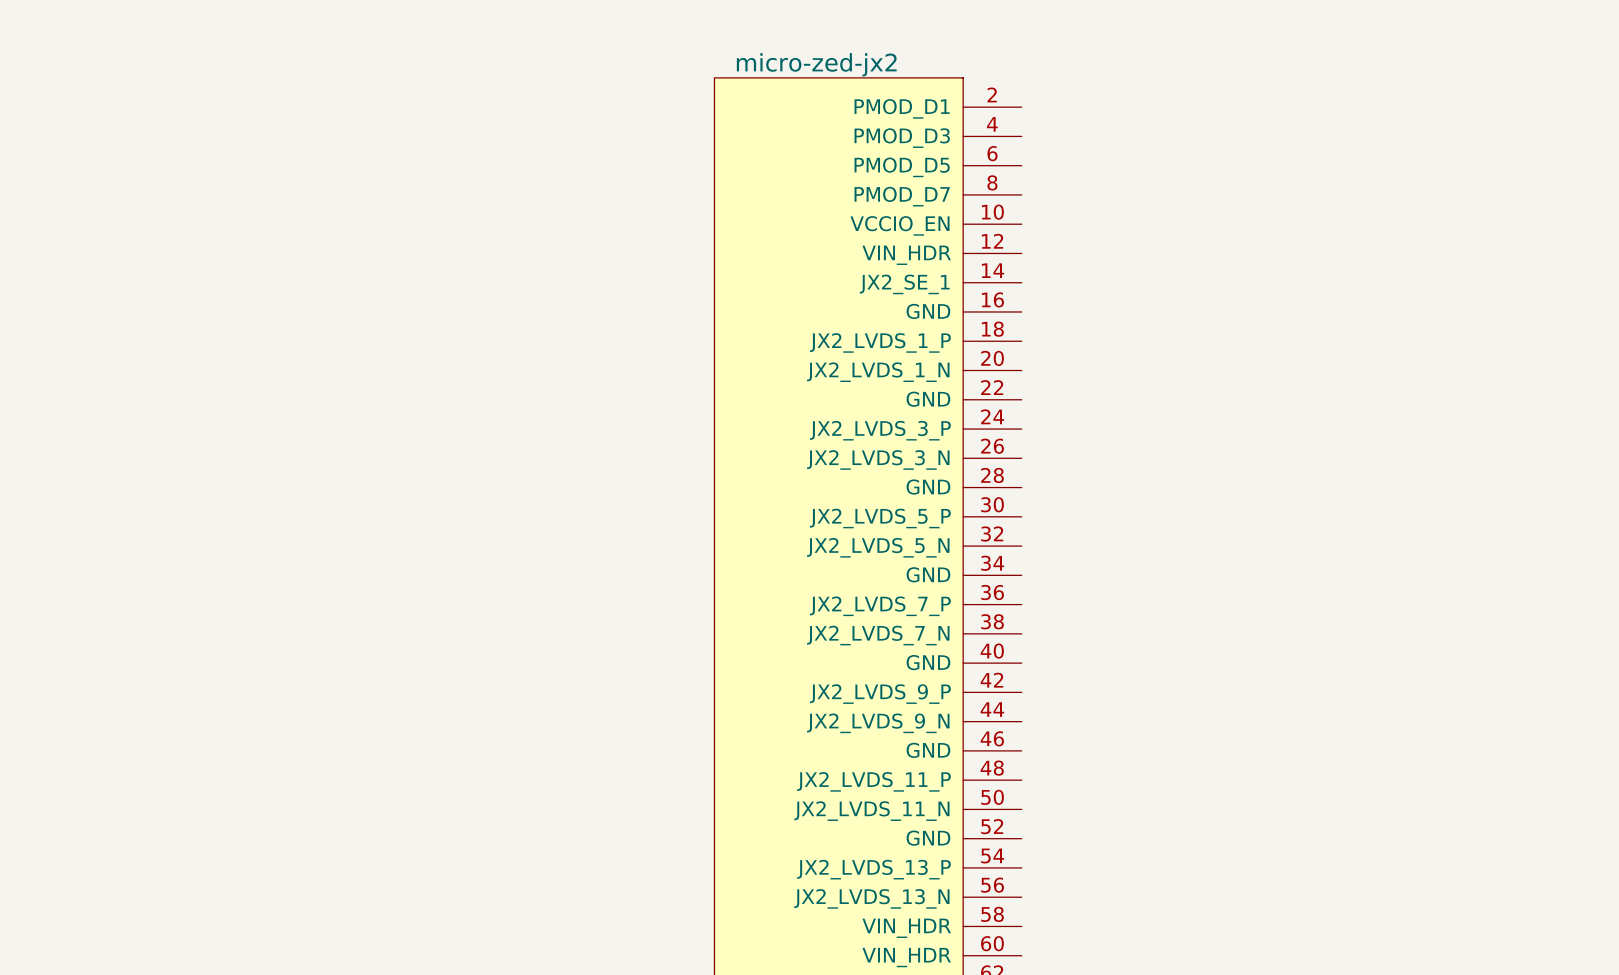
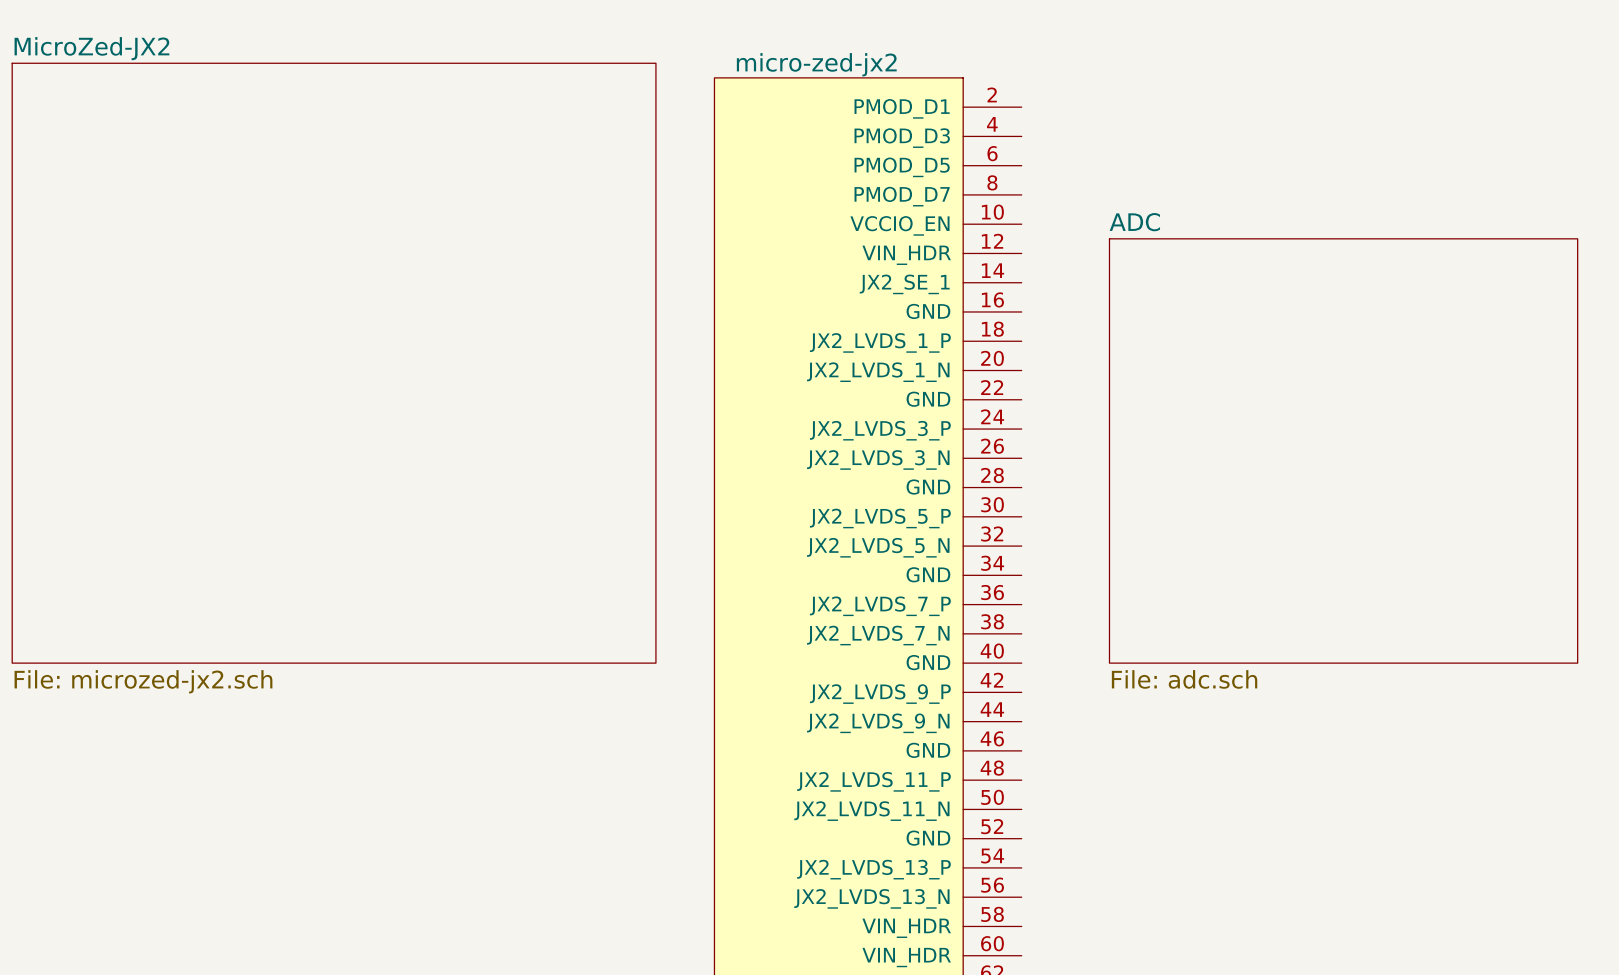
sheet MicroZed-JX2: none -> File: microzed-jx2.sch (334, 363)
sheet ADC: none -> File: adc.sch (1343, 450)

